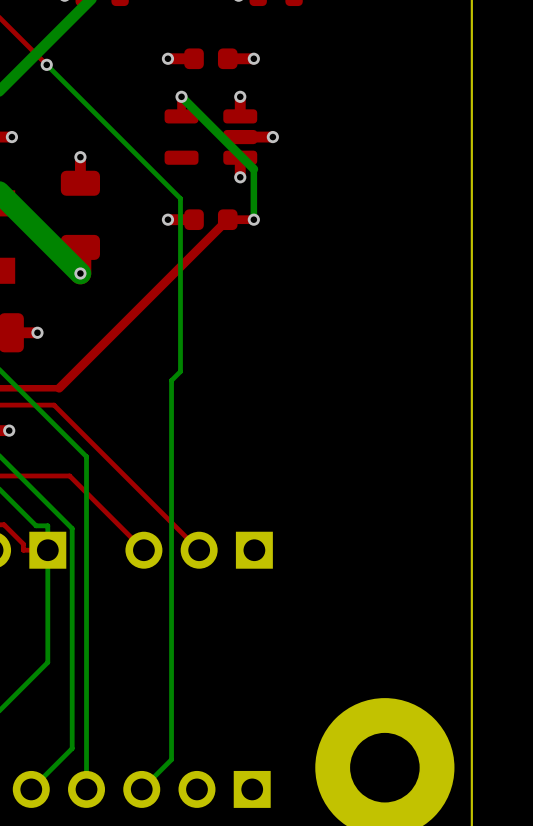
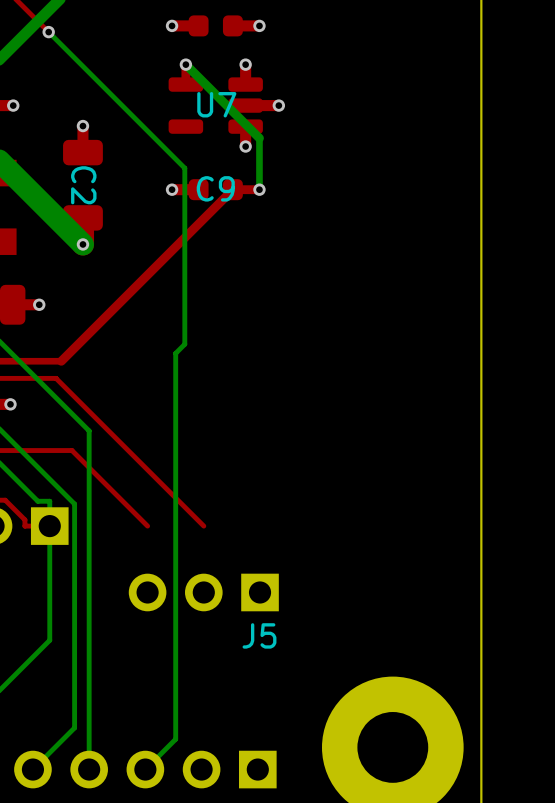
U7 name: none -> U7 (216, 104)
C2 name: none -> C2 (83, 185)
C9 name: none -> C9 (215, 188)
part: (199, 550) -> none
J5: none -> (203, 592)

